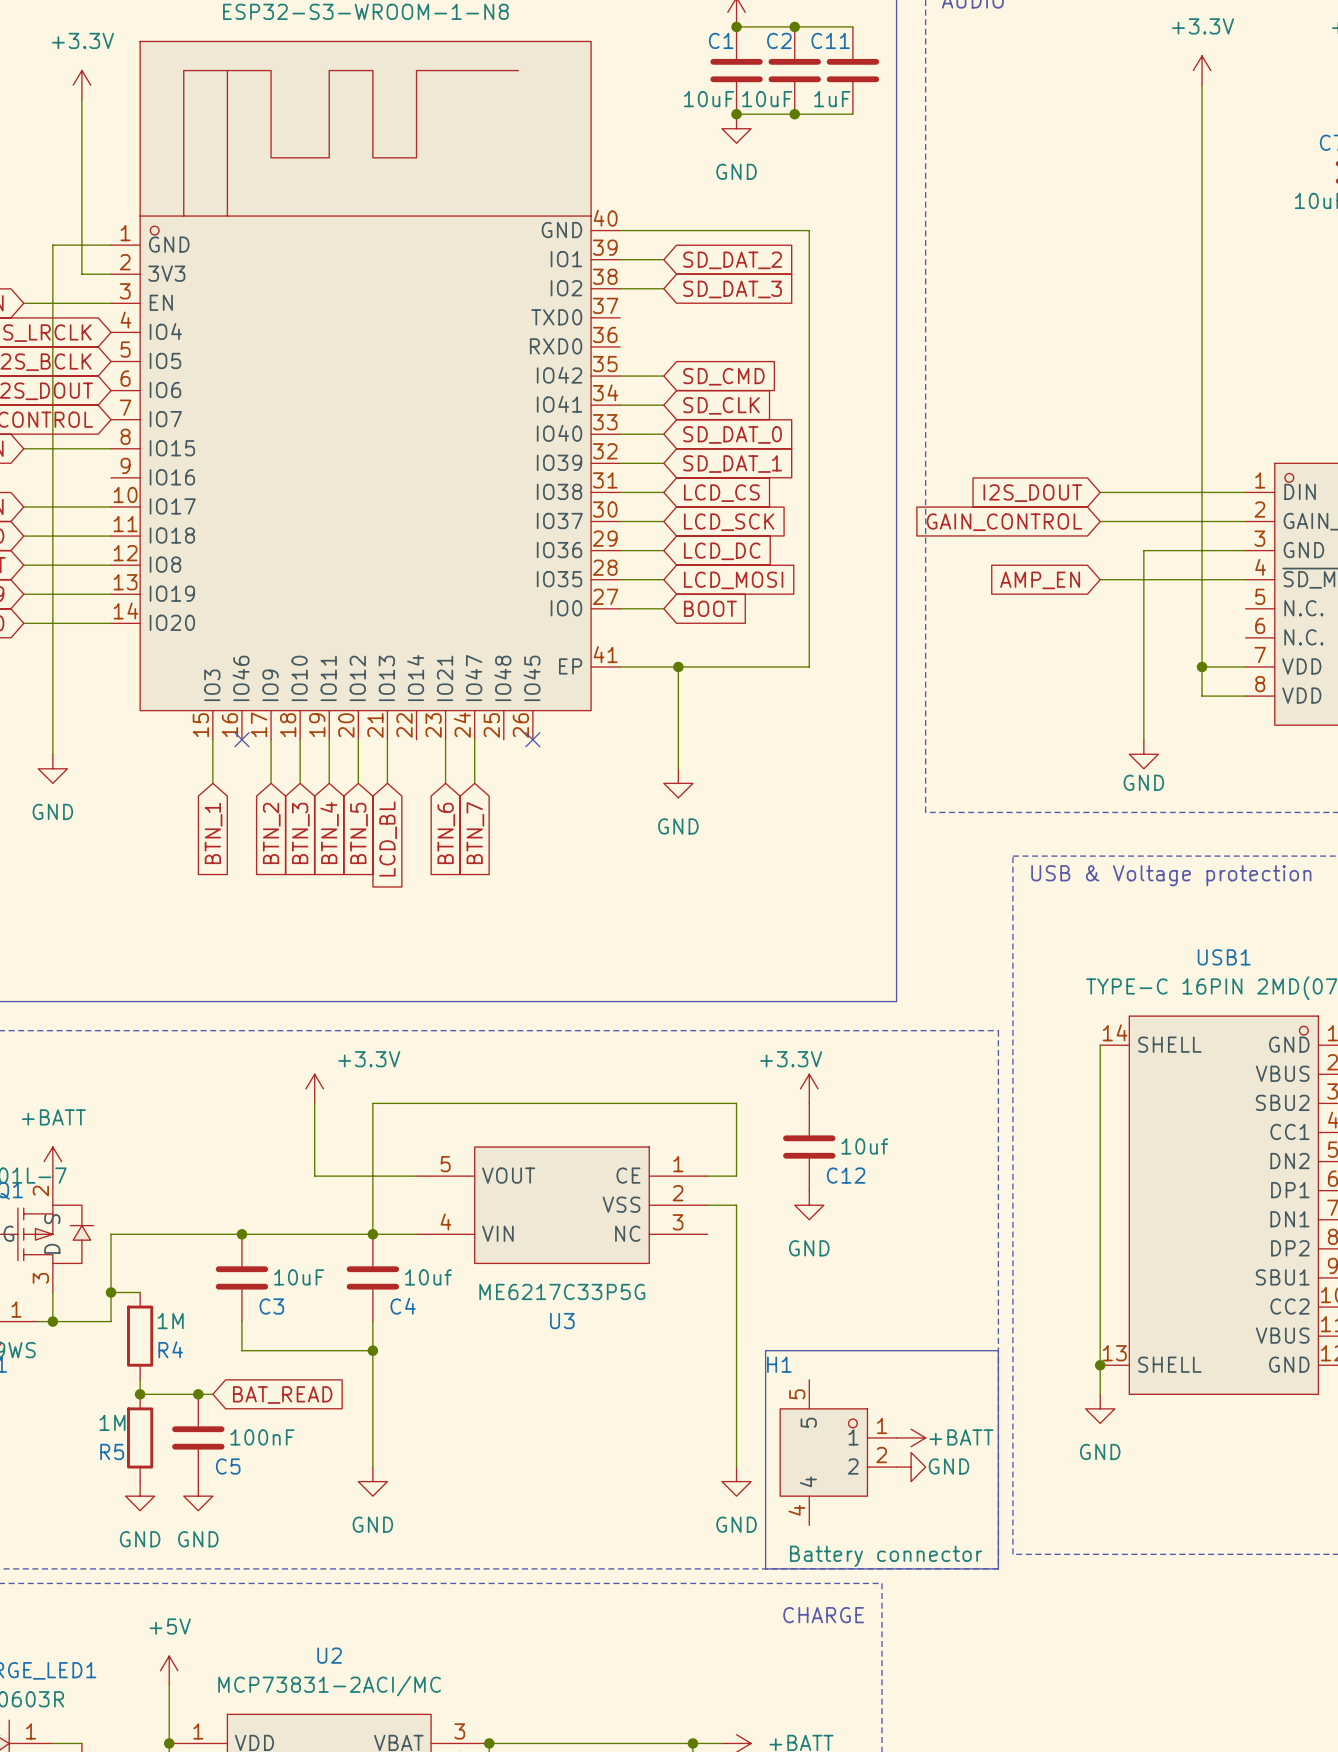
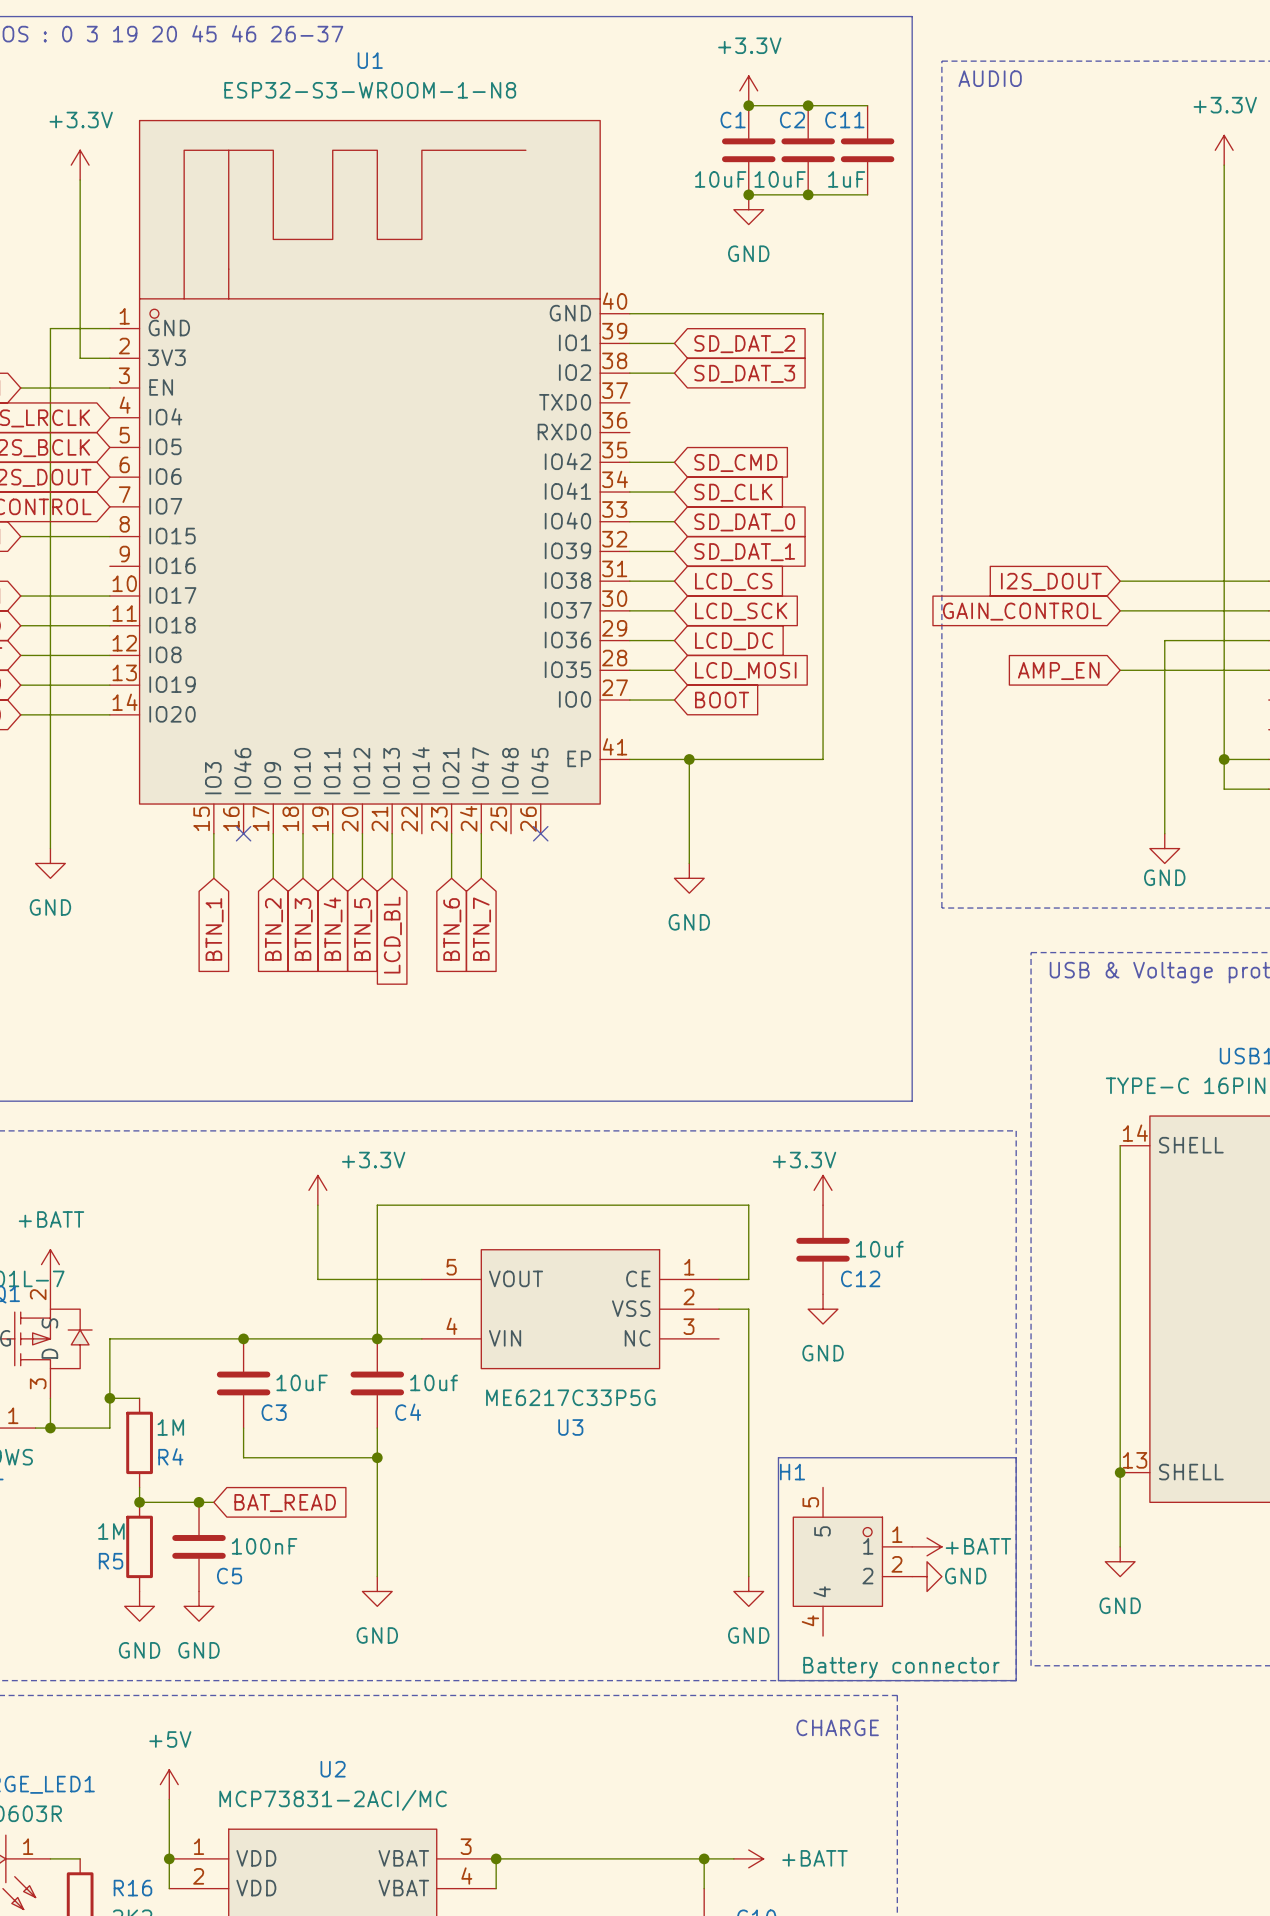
wire: none -> (1120, 1502) (1120, 1546)
power symbol position: GND (1100, 1408) -> GND (1120, 1561)

